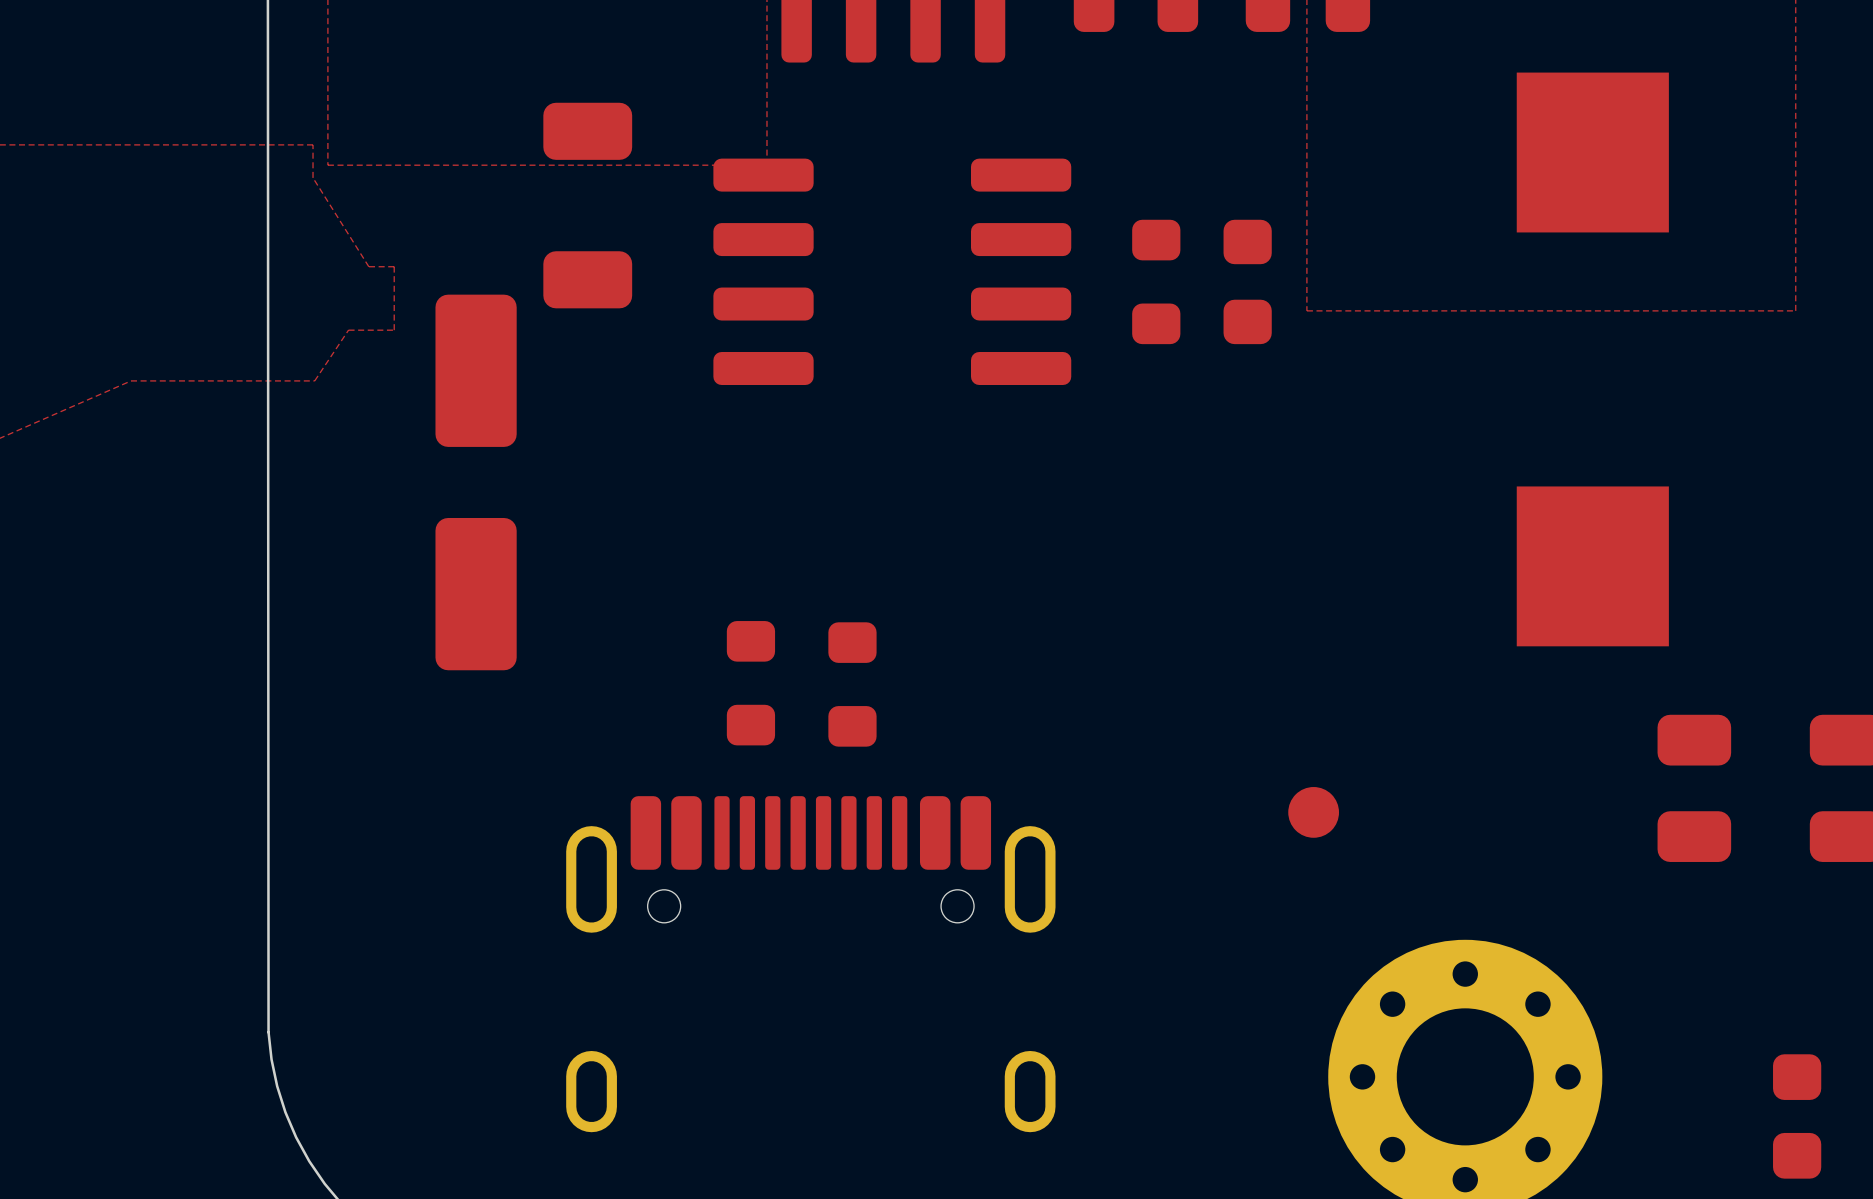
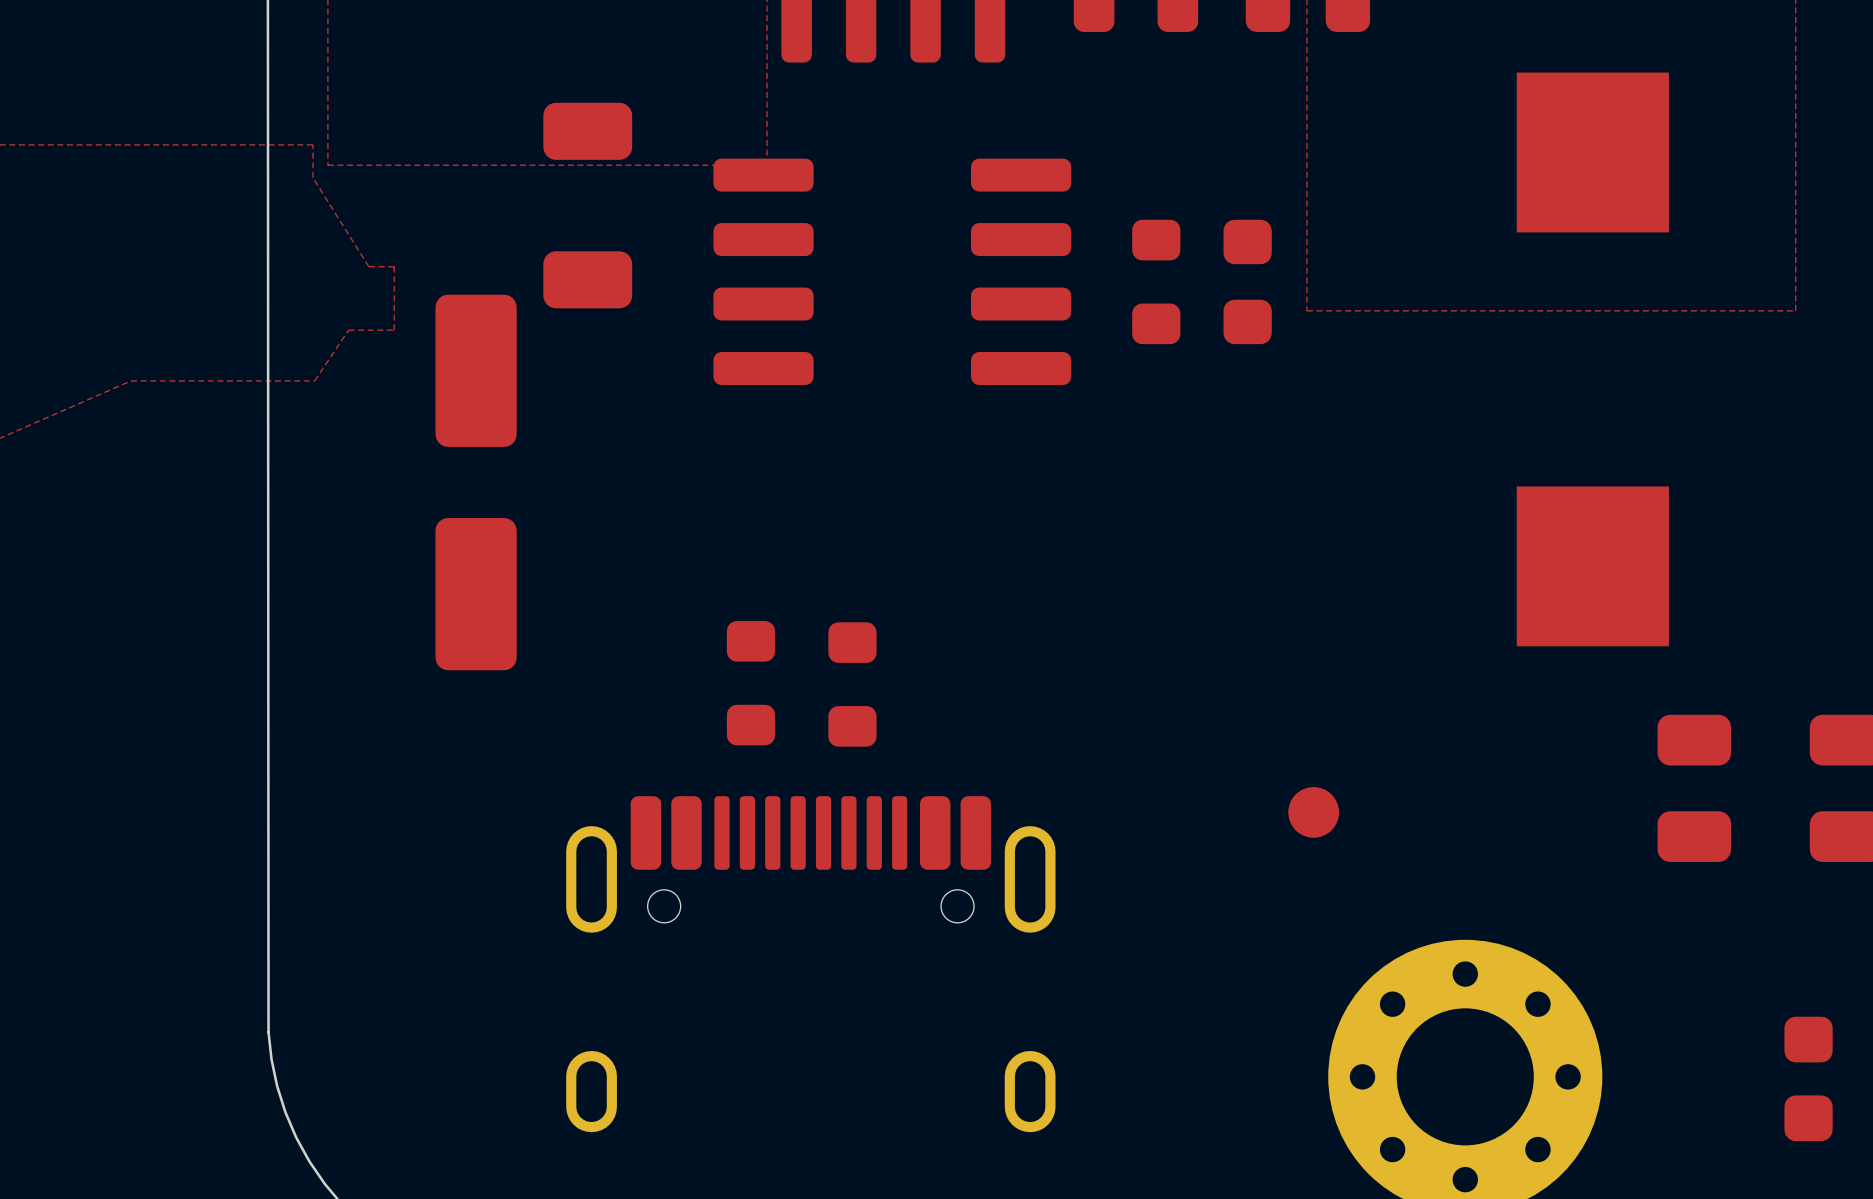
part position: (1797, 1116) -> (1808, 1078)

